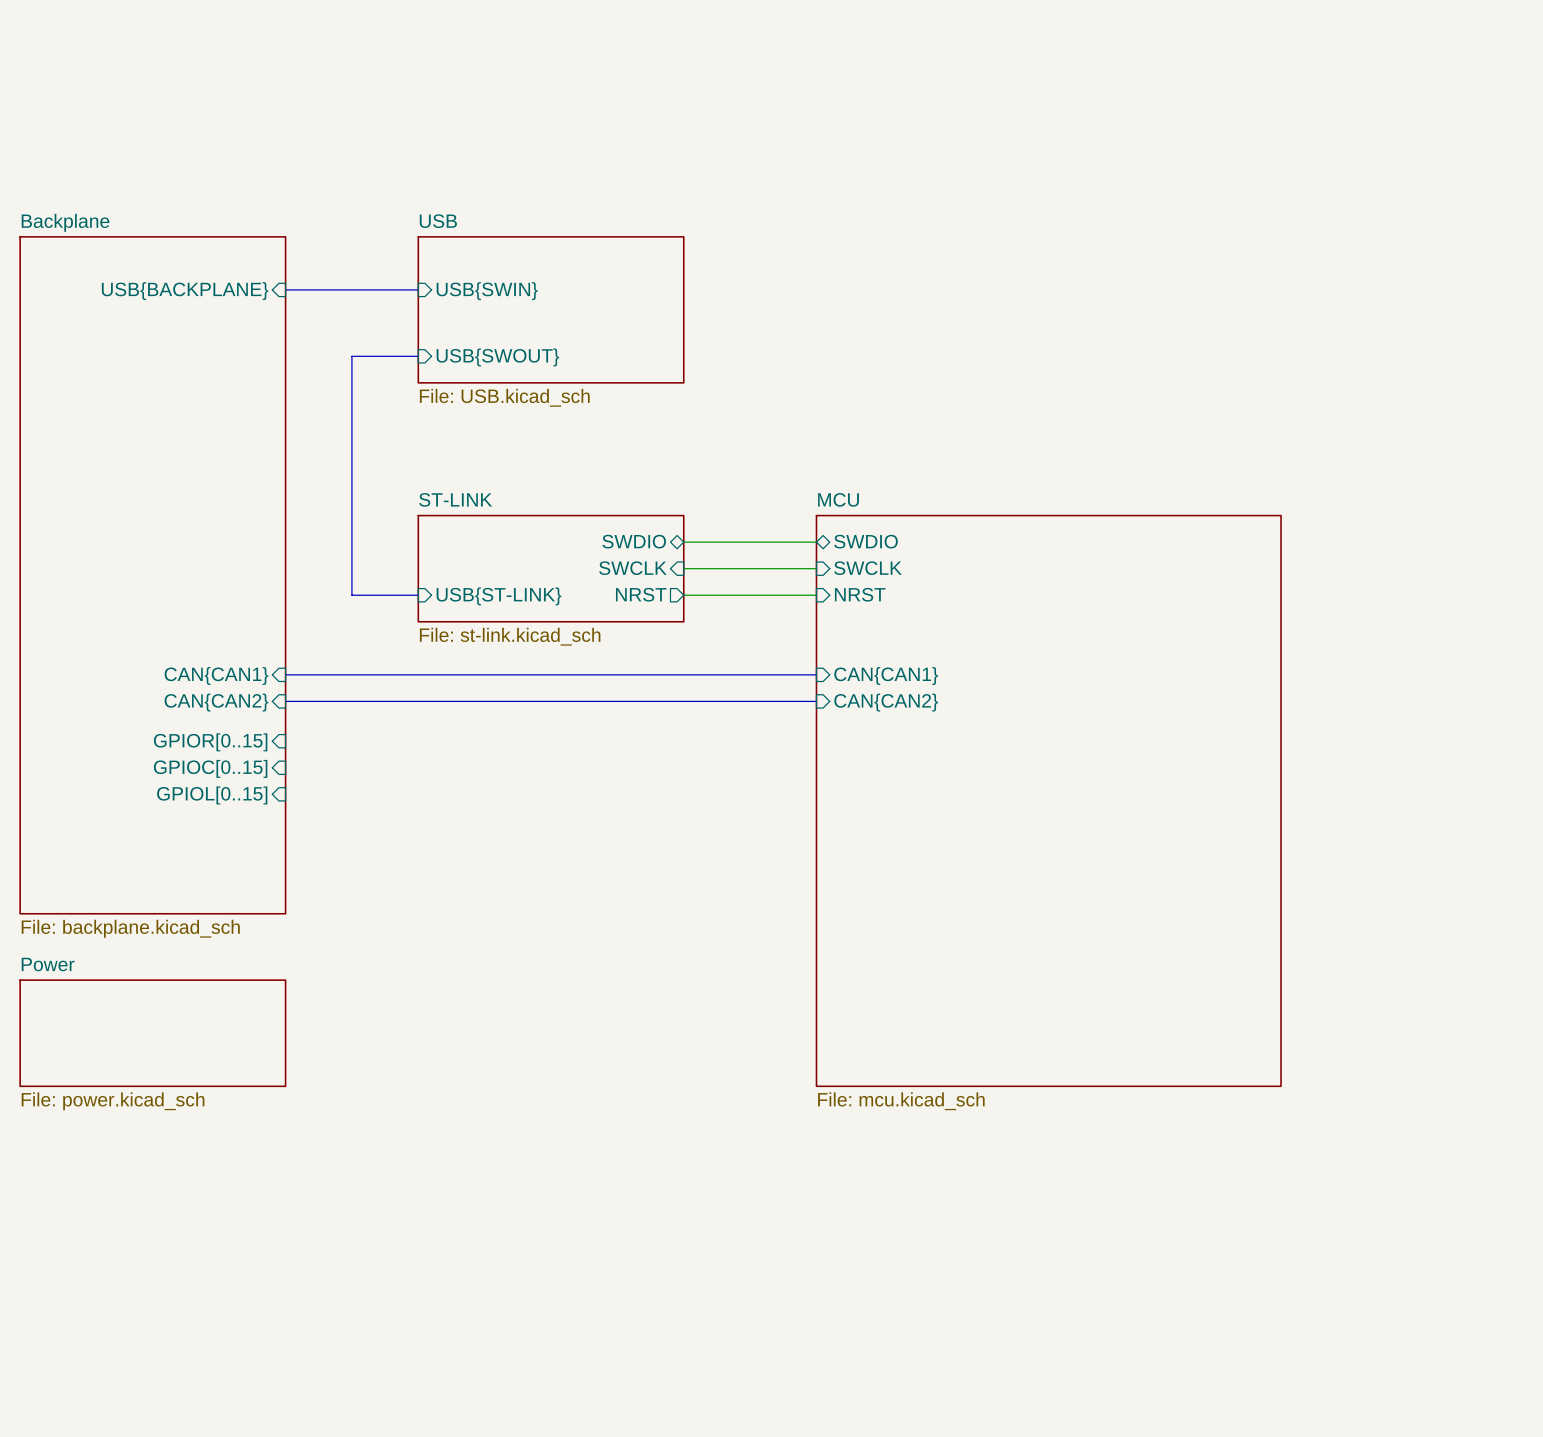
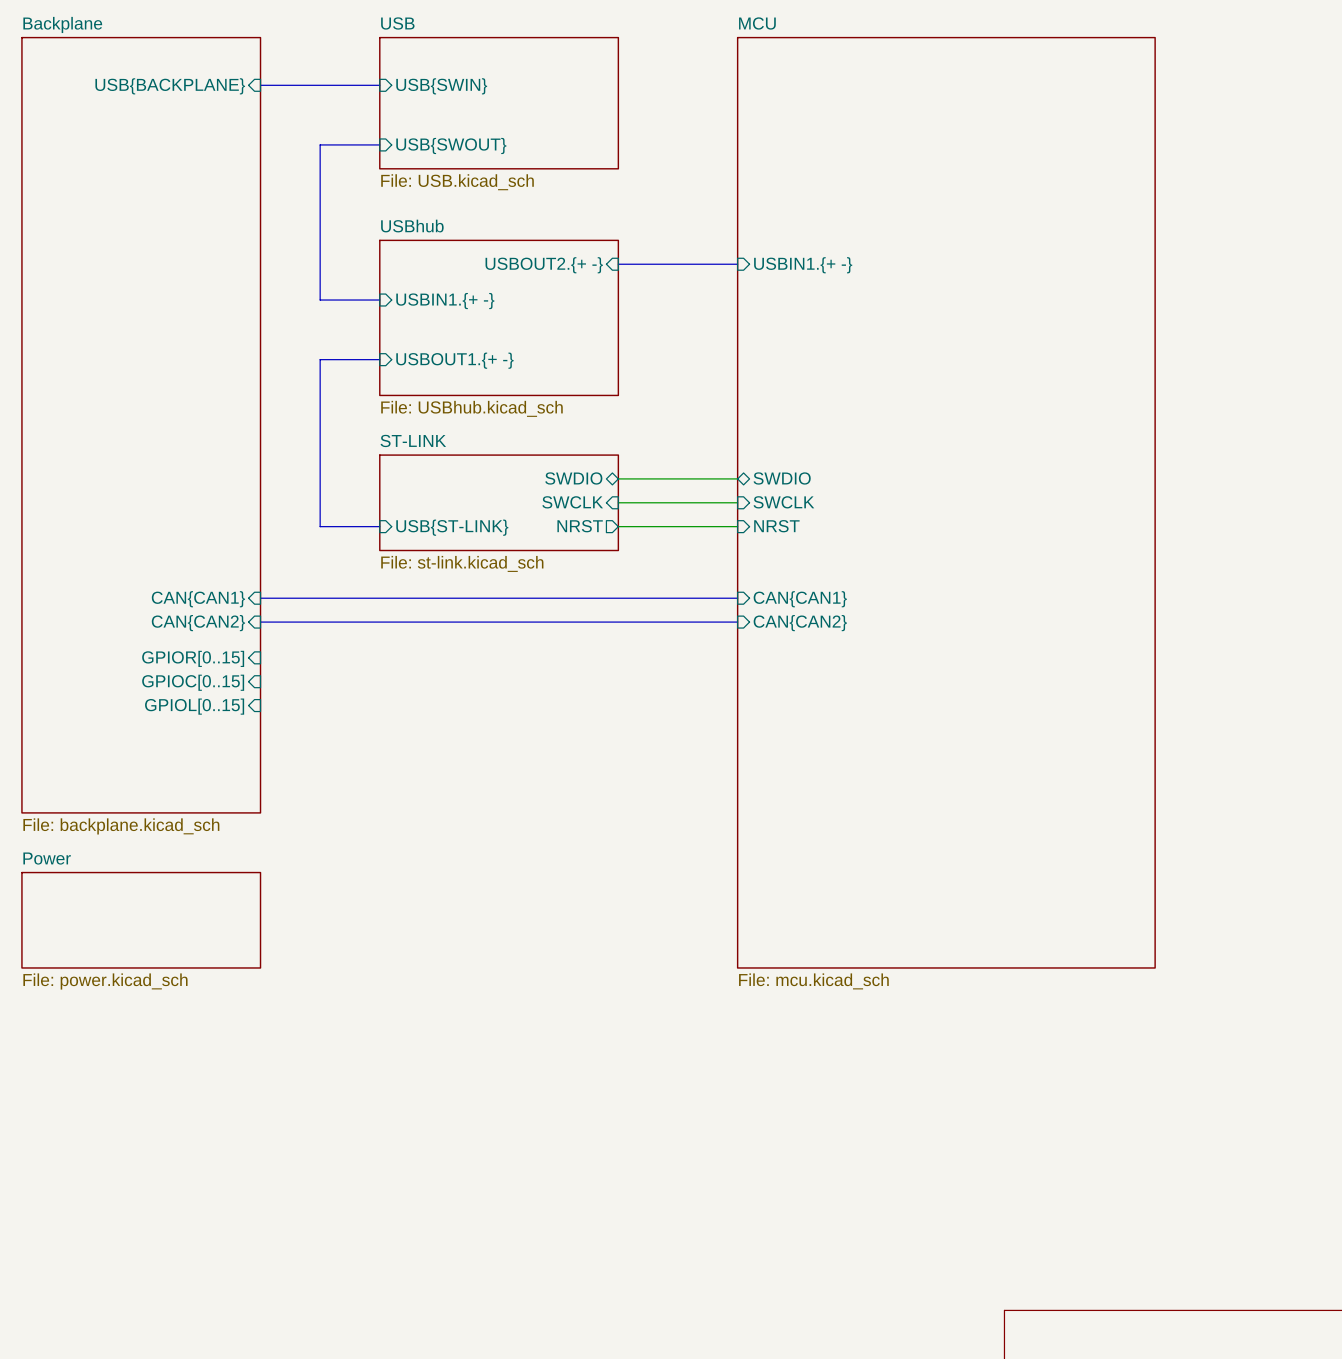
bus: none -> (379, 144) (320, 144) (320, 300) (379, 300)
bus: (285, 289) (418, 289) -> (260, 85) (379, 85)
sheet pin position: USB{BACKPLANE} (185, 291) -> USB{BACKPLANE} (170, 86)
sheet pin position: USB{SWIN} (487, 291) -> USB{SWIN} (441, 86)
bus: none -> (618, 264) (737, 264)
sheet pin: none -> USBOUT2.{+ -} (544, 265)
sheet pin: none -> USBIN1.{+ -} (803, 265)
sheet USB position: (551, 309) -> (499, 103)
sheet pin: none -> USBIN1.{+ -} (445, 301)
bus: (418, 356) (351, 356) (351, 409) -> (379, 359) (320, 359)
sheet pin position: USB{SWOUT} (497, 357) -> USB{SWOUT} (451, 145)
sheet USBhub: none -> File: USBhub.kicad_sch (499, 317)
sheet pin: none -> USBOUT1.{+ -} (454, 360)
sheet Backplane: none -> File: backplane.kicad_sch (141, 425)
sheet MCU: none -> File: mcu.kicad_sch (946, 502)
sheet Backplane: File: backplane.kicad_sch (152, 575) -> none
sheet MCU: File: mcu.kicad_sch (1048, 800) -> none

